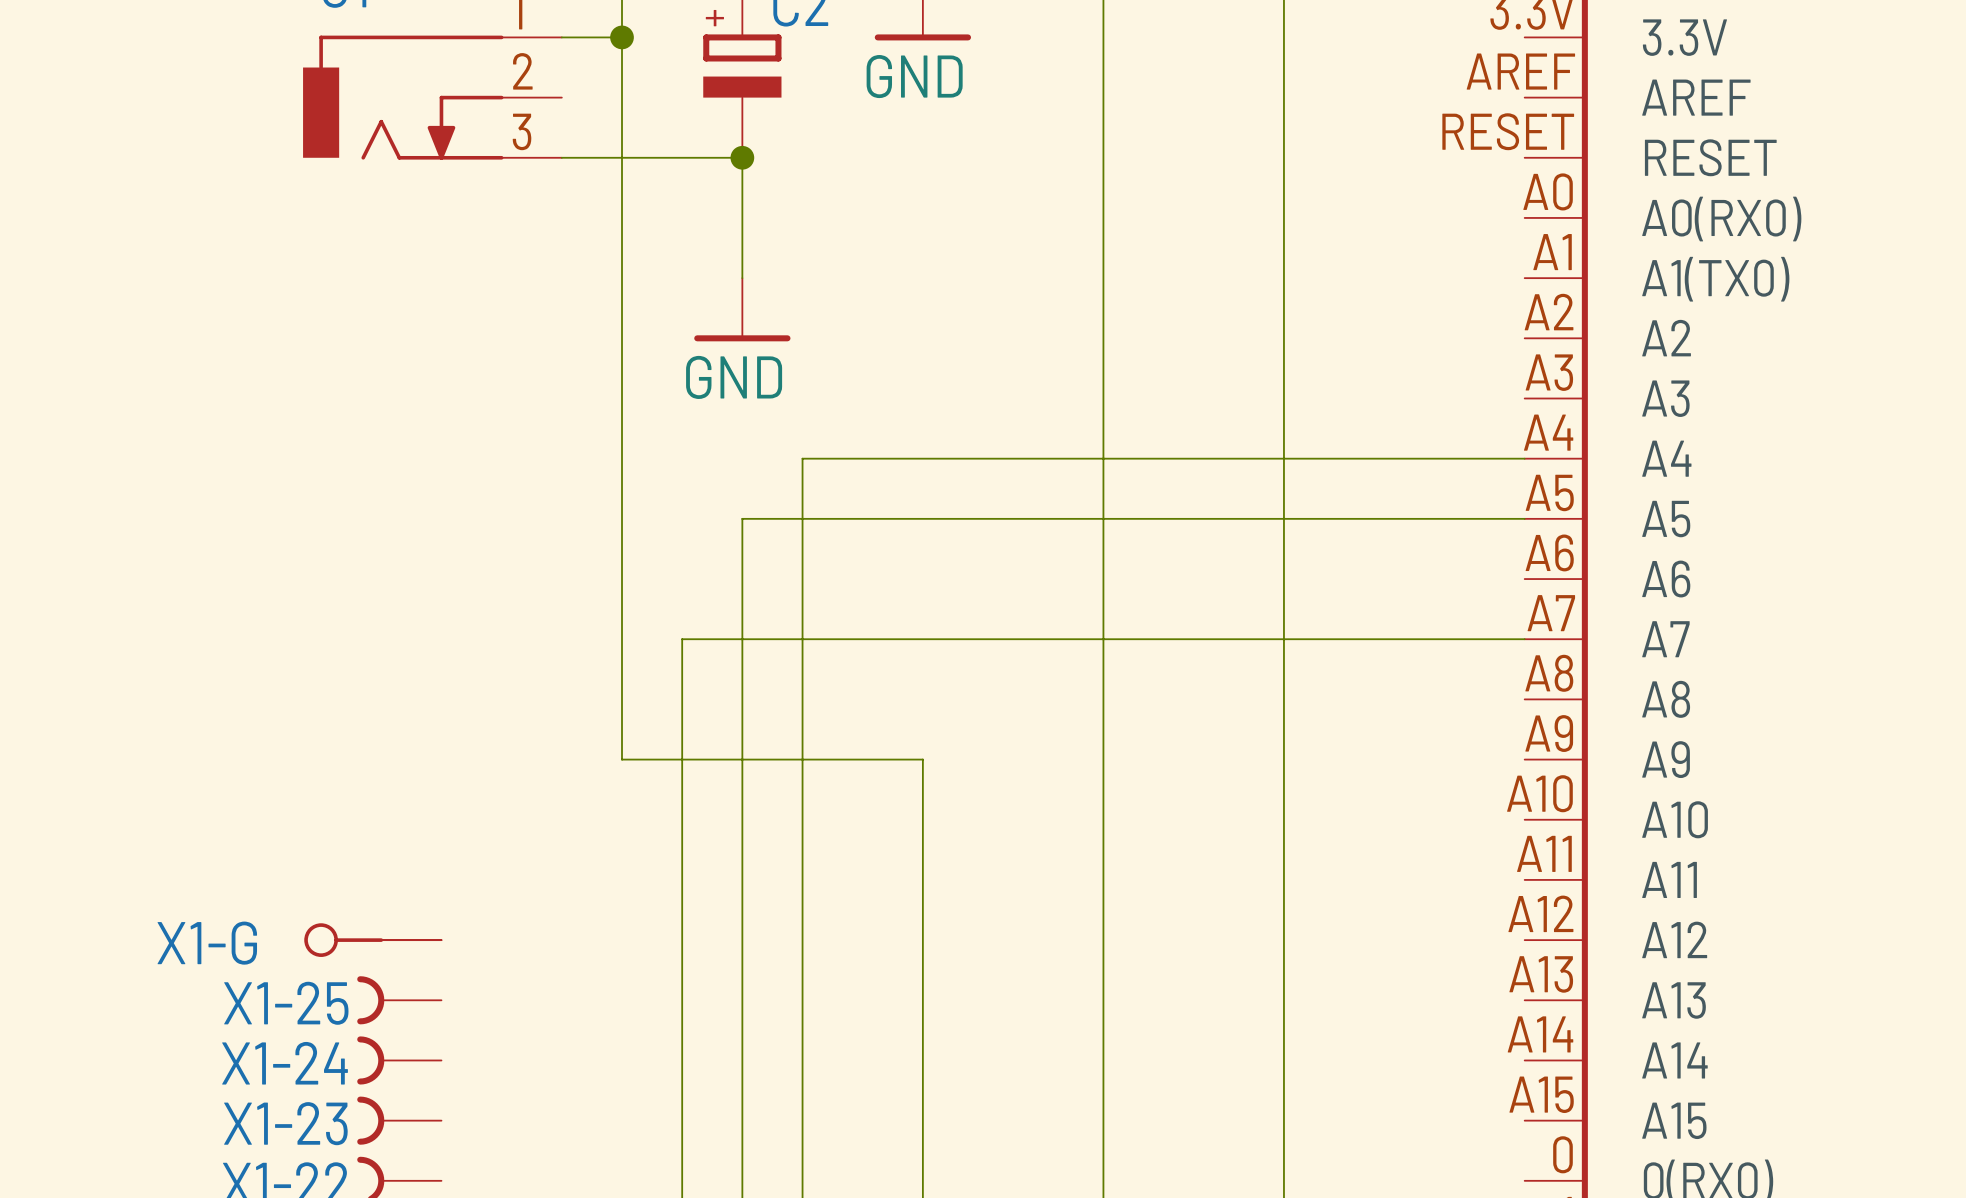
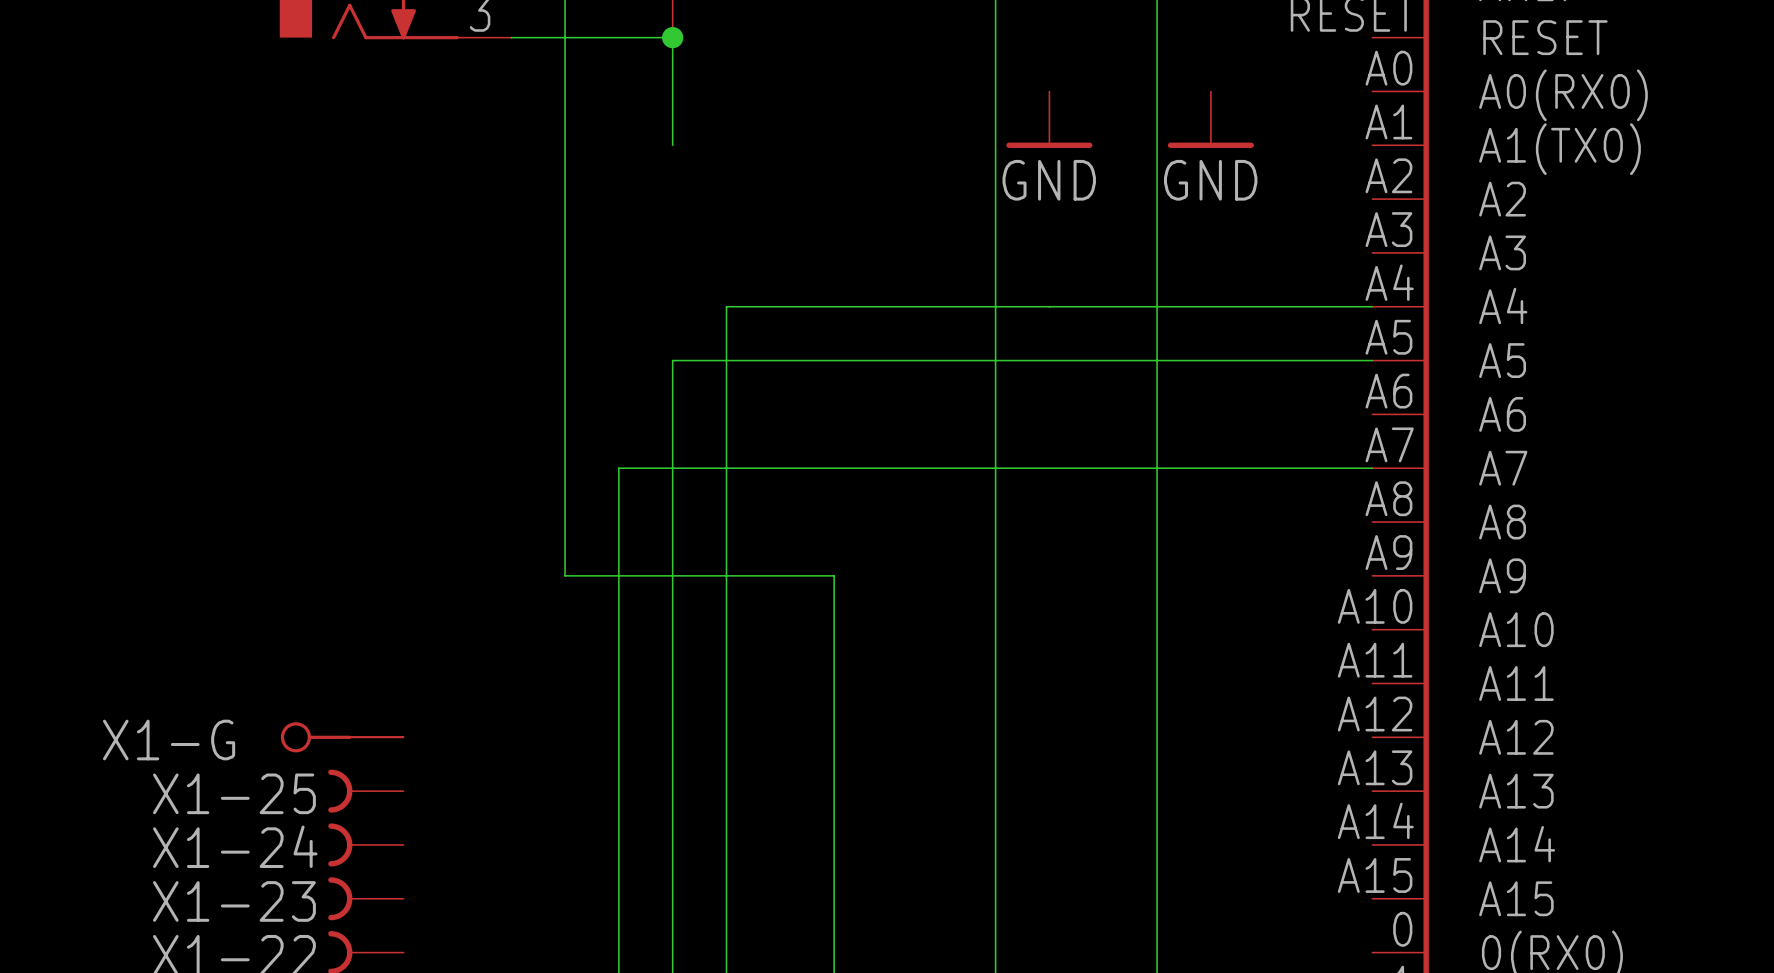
power symbol: none -> GND (1049, 119)
power symbol: none -> GND (1210, 119)
power symbol: GND (742, 309) -> none

